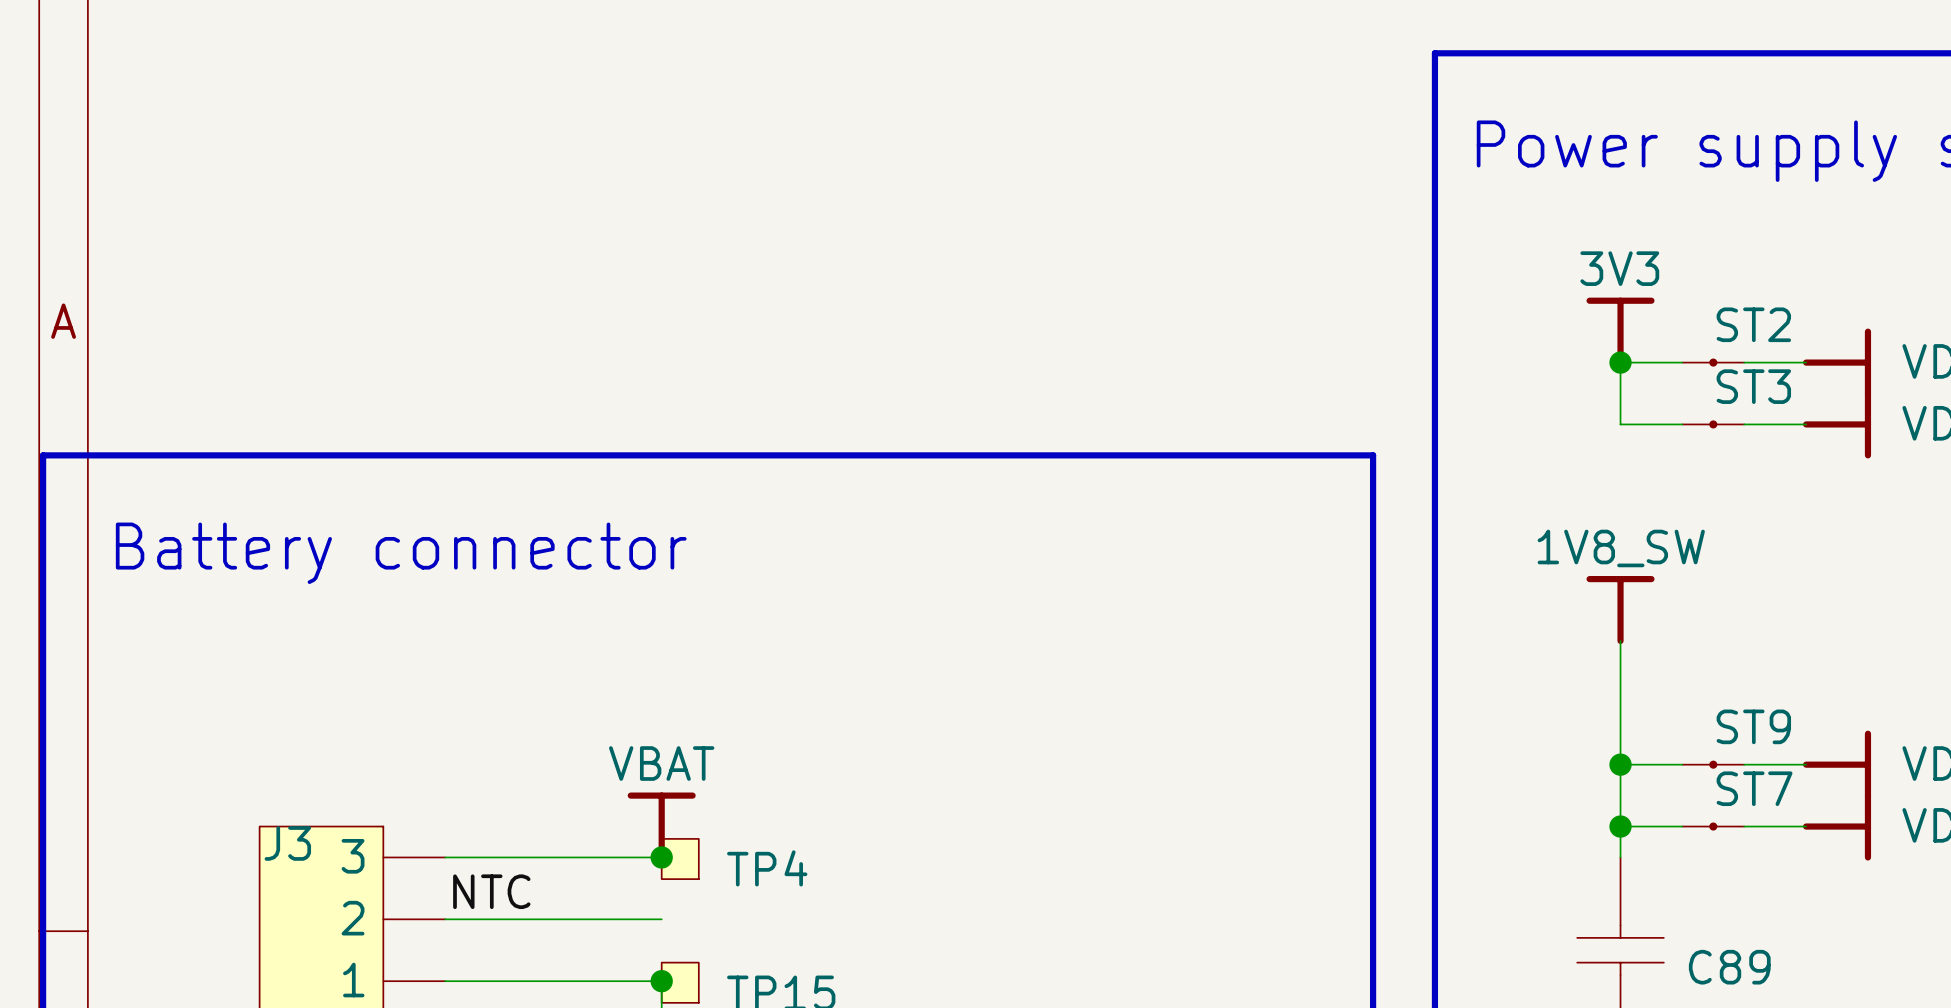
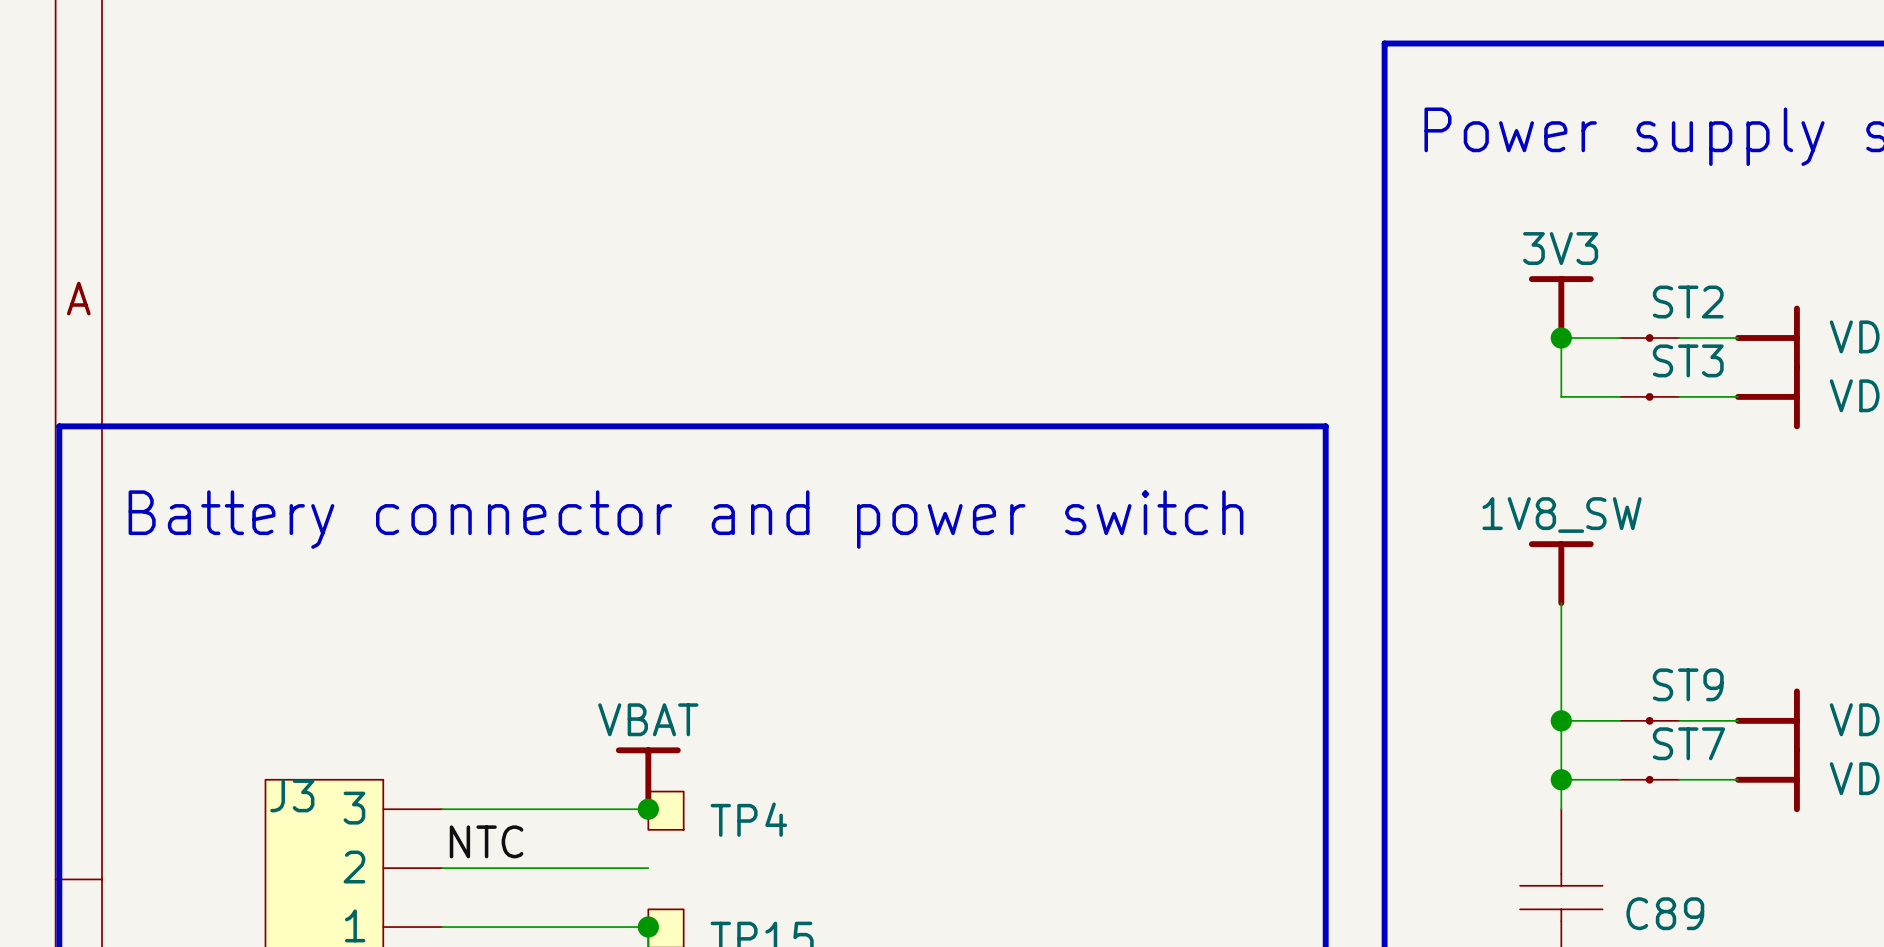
text: Battery connector (401, 553) -> Battery connector and power switch (686, 519)

